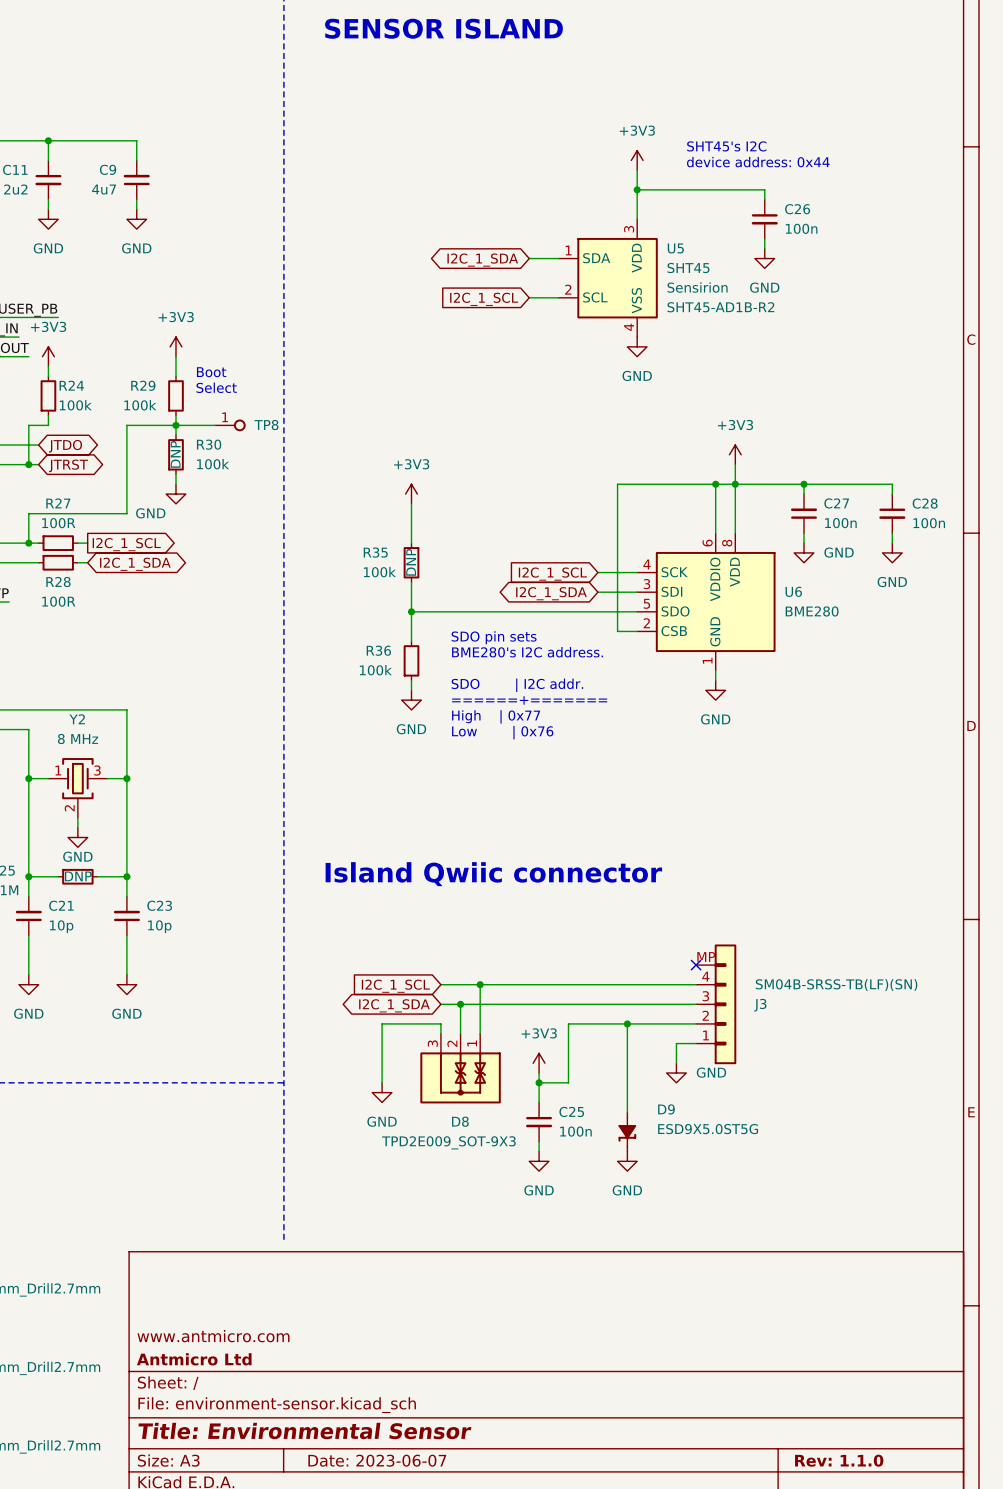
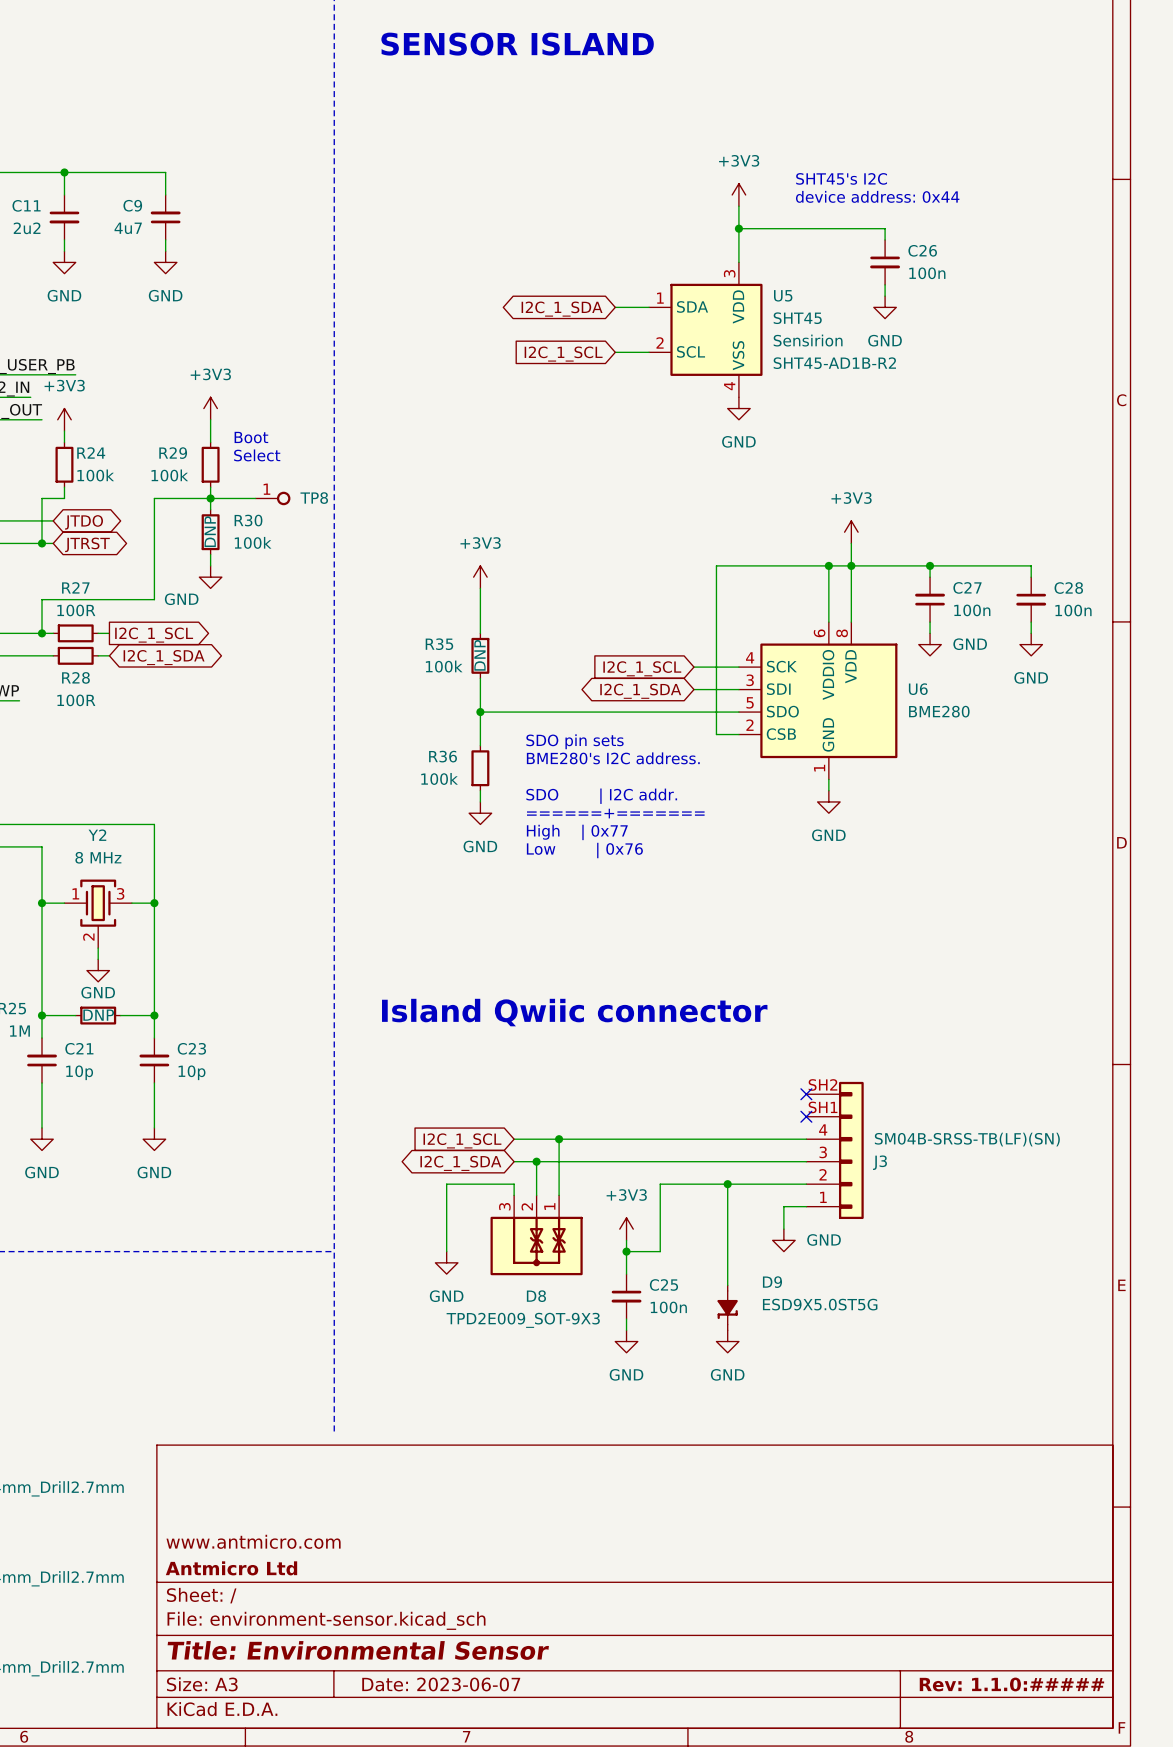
J3 symbol: [696, 944, 737, 1065] -> [806, 1081, 864, 1220]
no-connect mark: none -> (806, 1094)
title block: Rev: 1.1.0 (839, 1460) -> Rev: 1.1.0:##### (1011, 1684)

